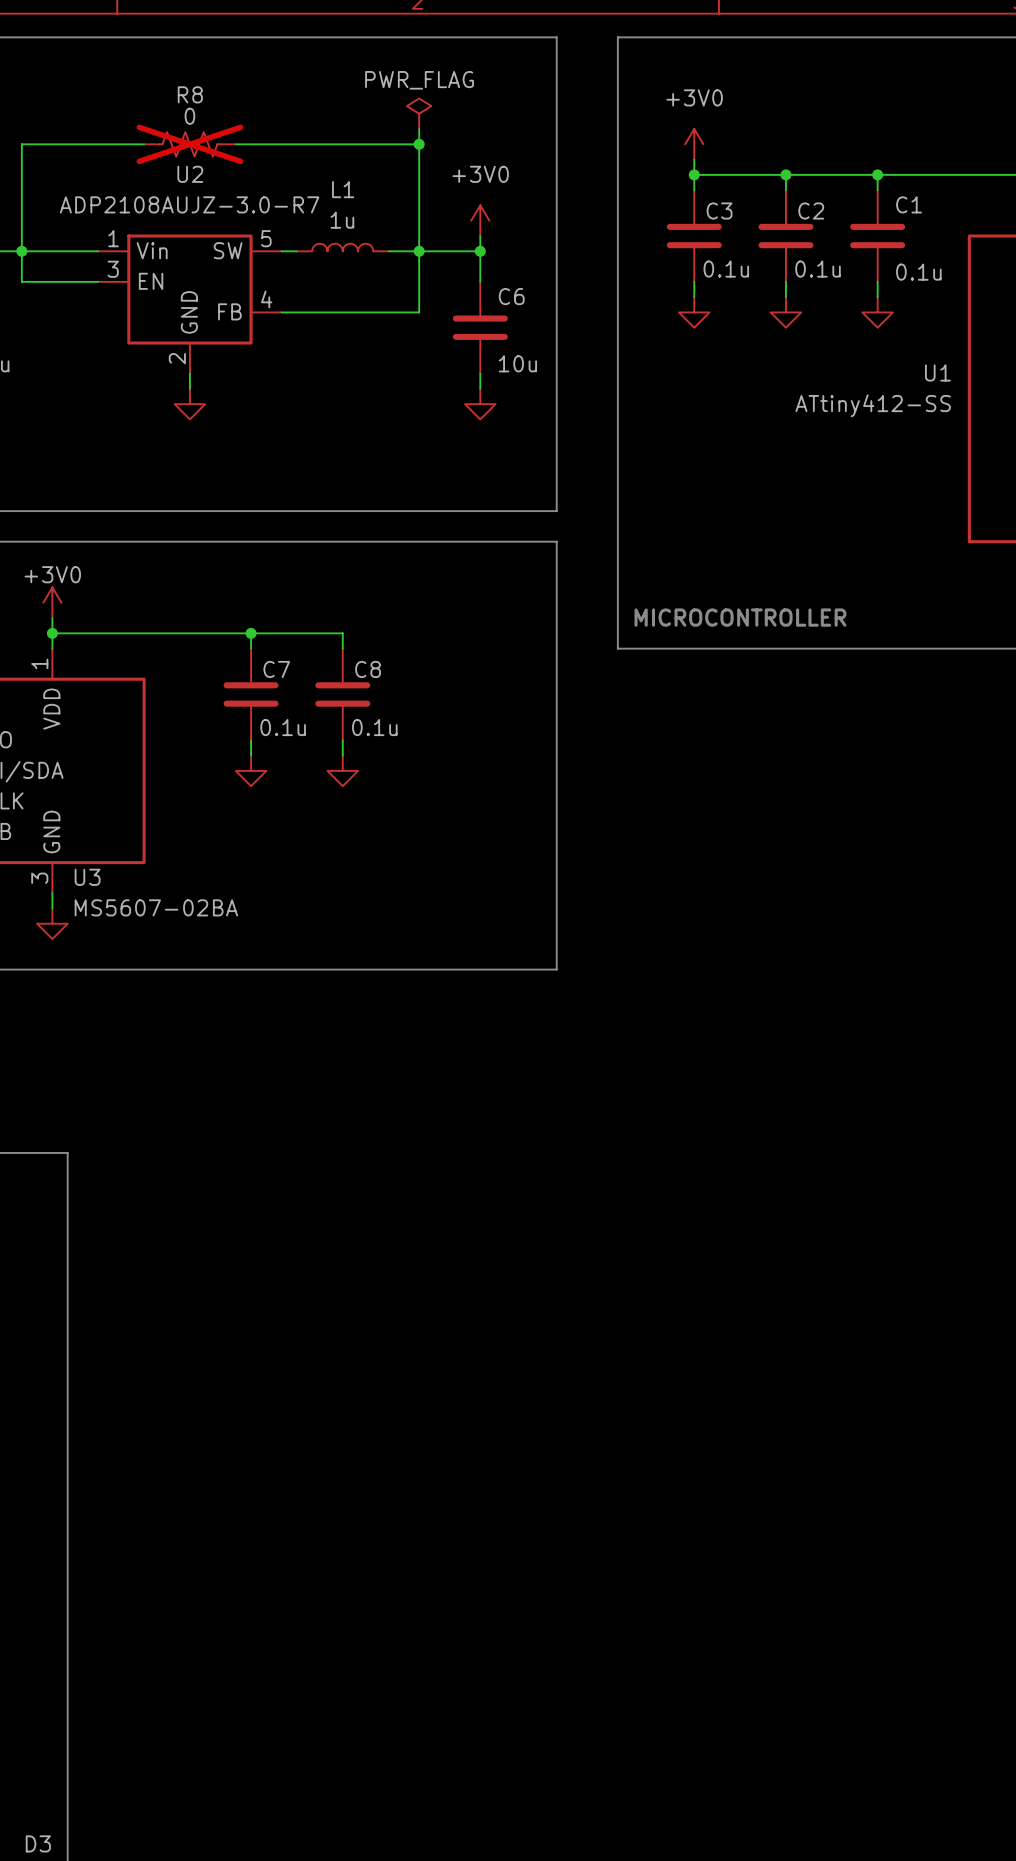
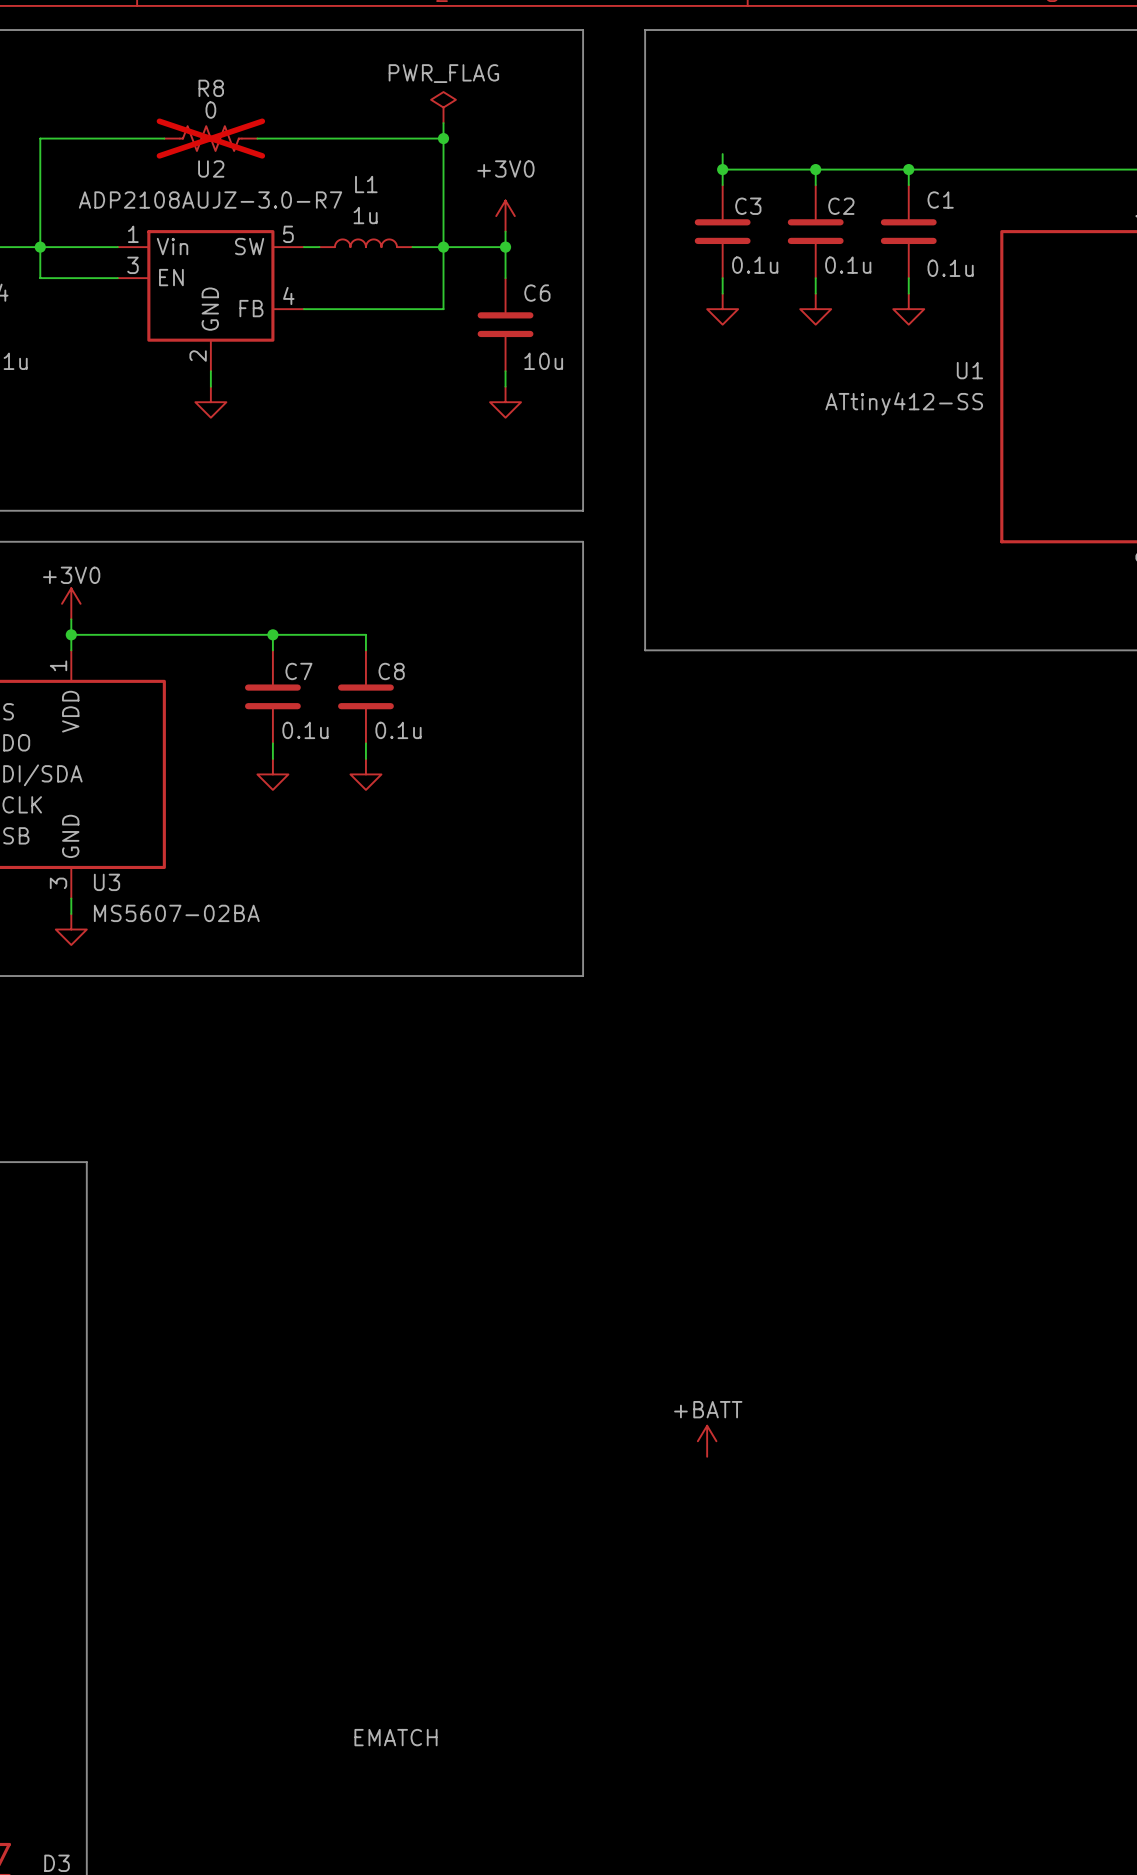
power symbol: +3V0 (694, 144) -> none
text: MICROCONTROLLER (740, 617) -> none
power symbol: none -> +BATT (707, 1441)
label: none -> EMATCH (395, 1737)

